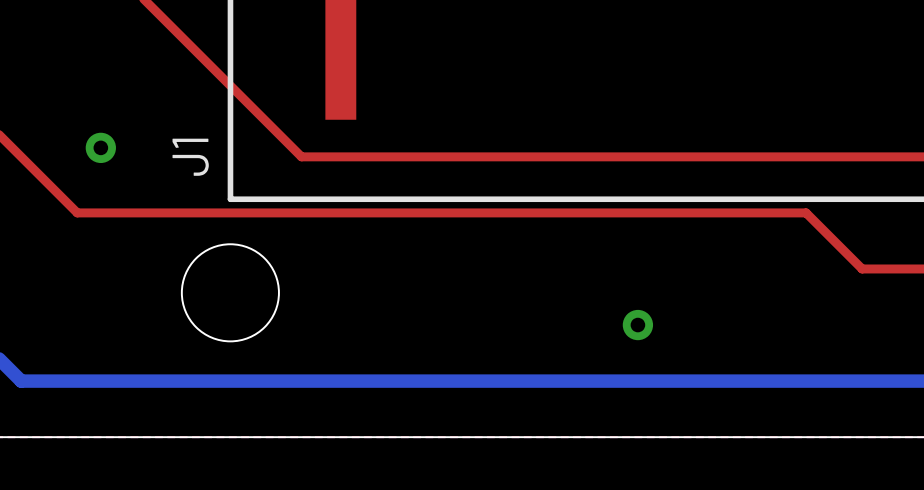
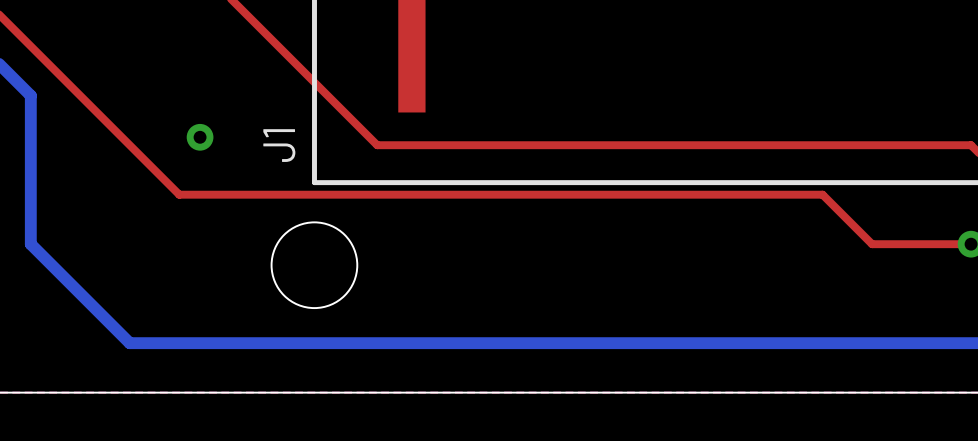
via: (637, 325) -> none

